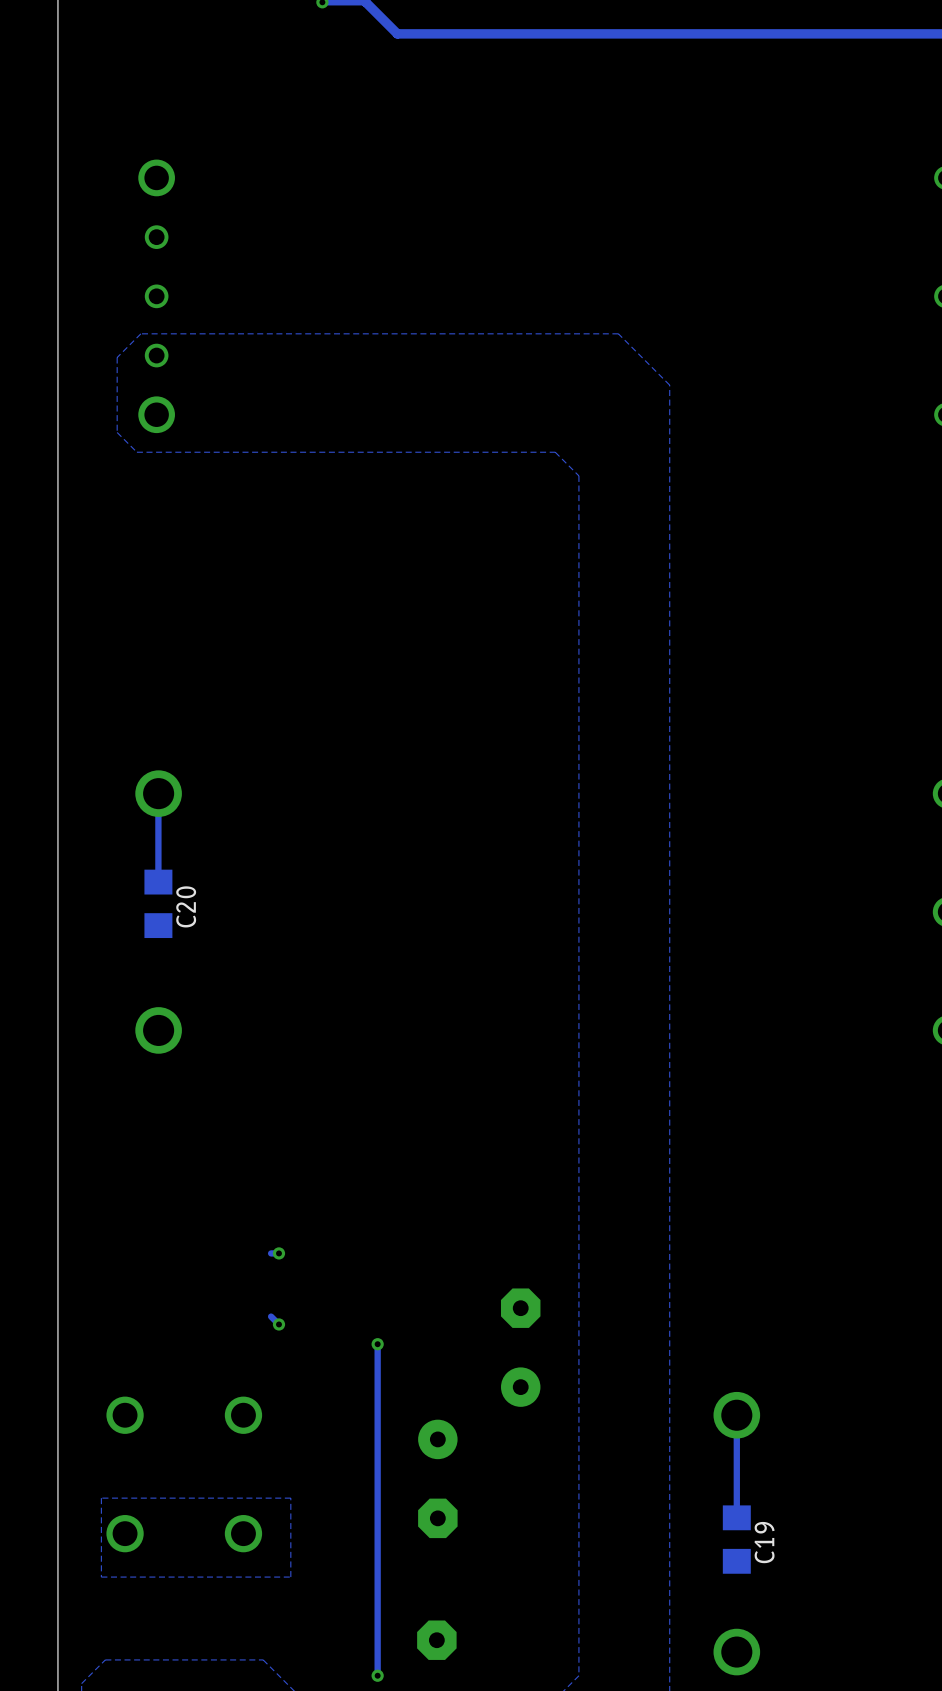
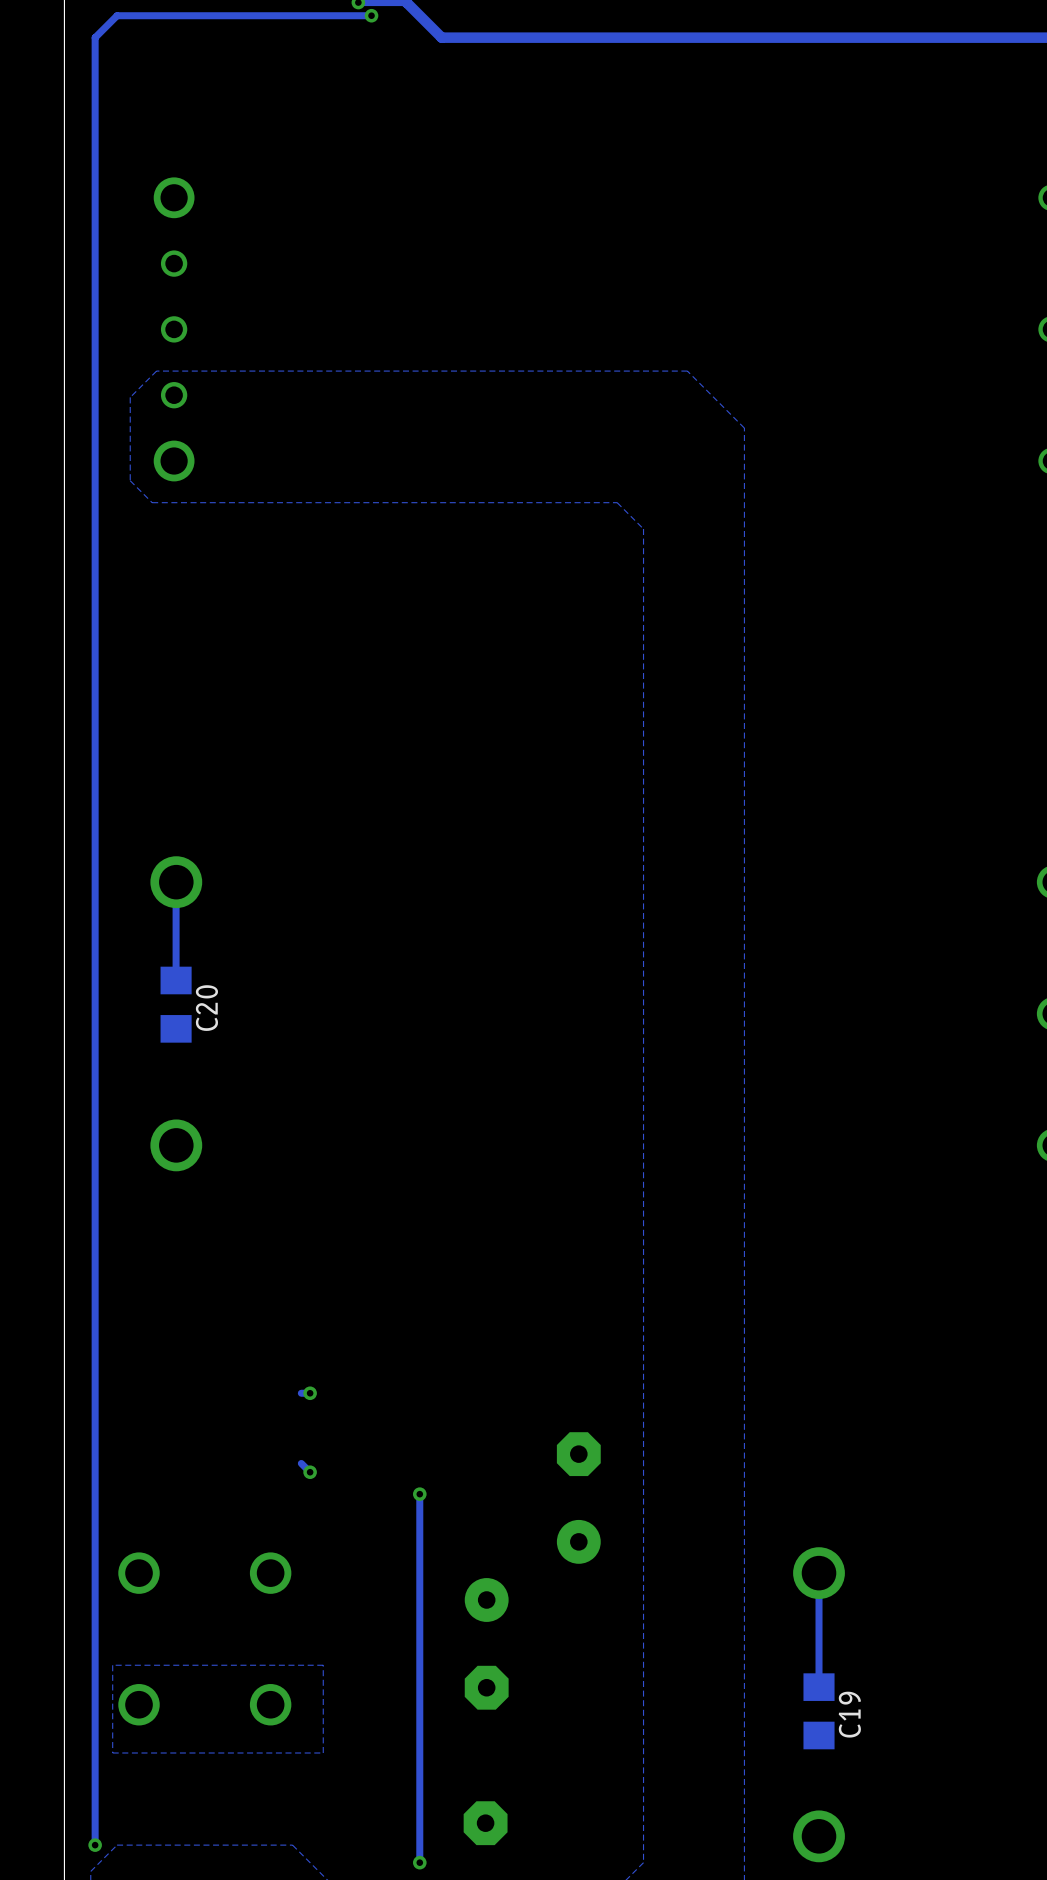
track: none -> (371, 15) (117, 15) (95, 37) (95, 1845)
via: none -> (371, 15)
via: none -> (95, 1845)

